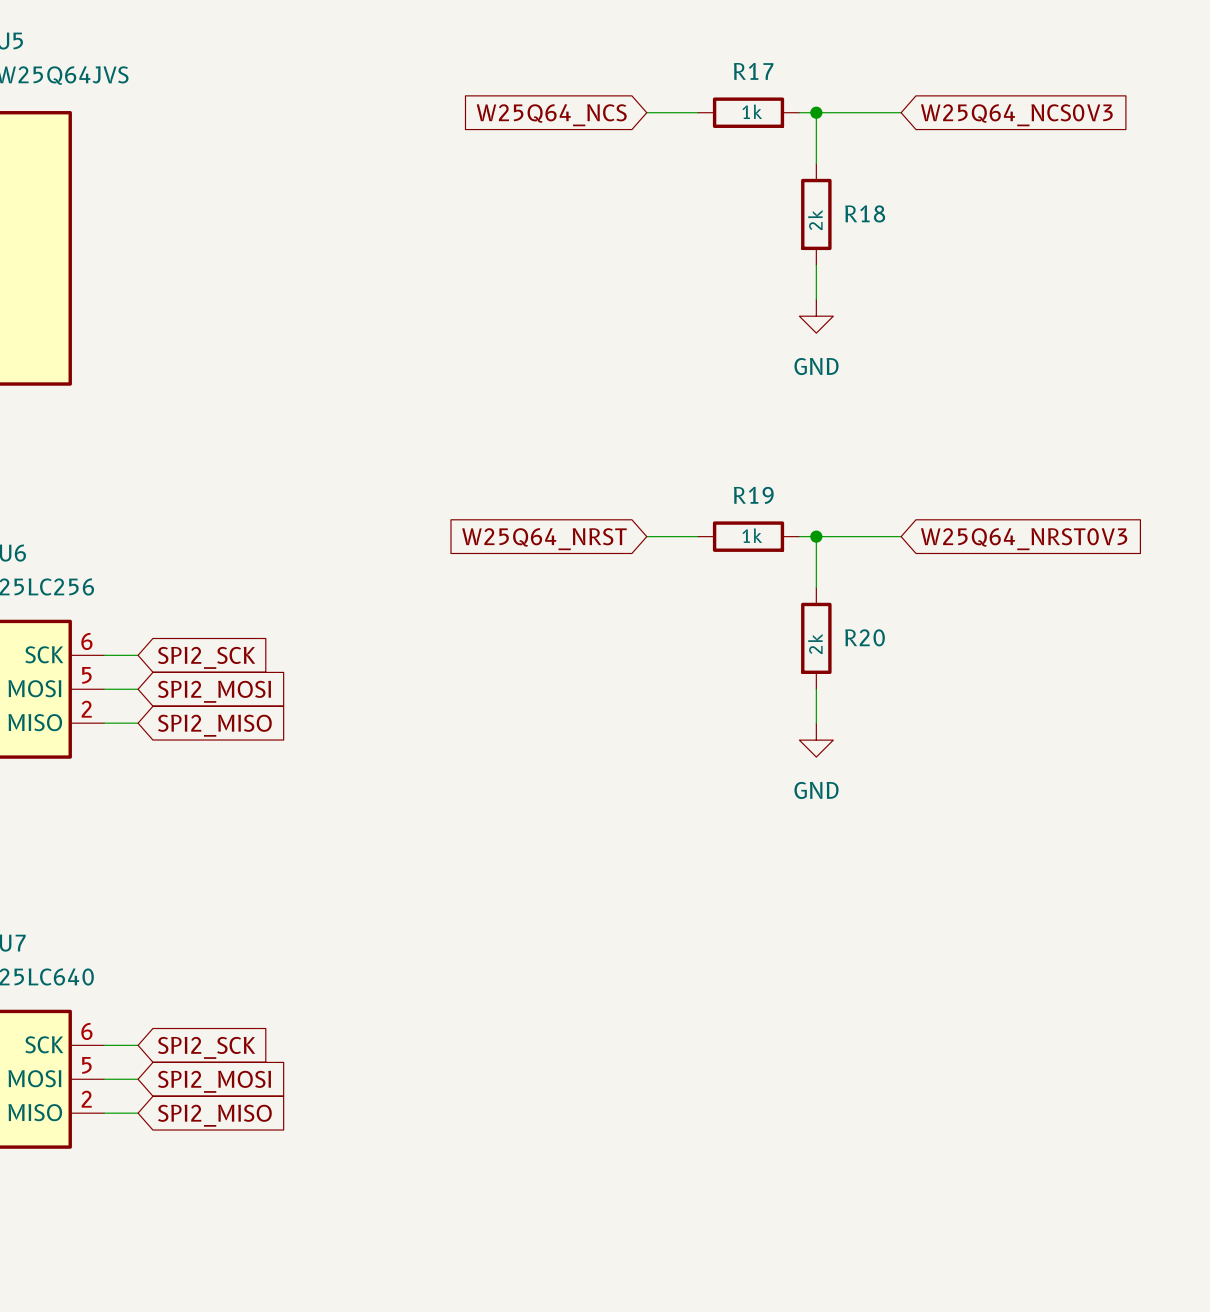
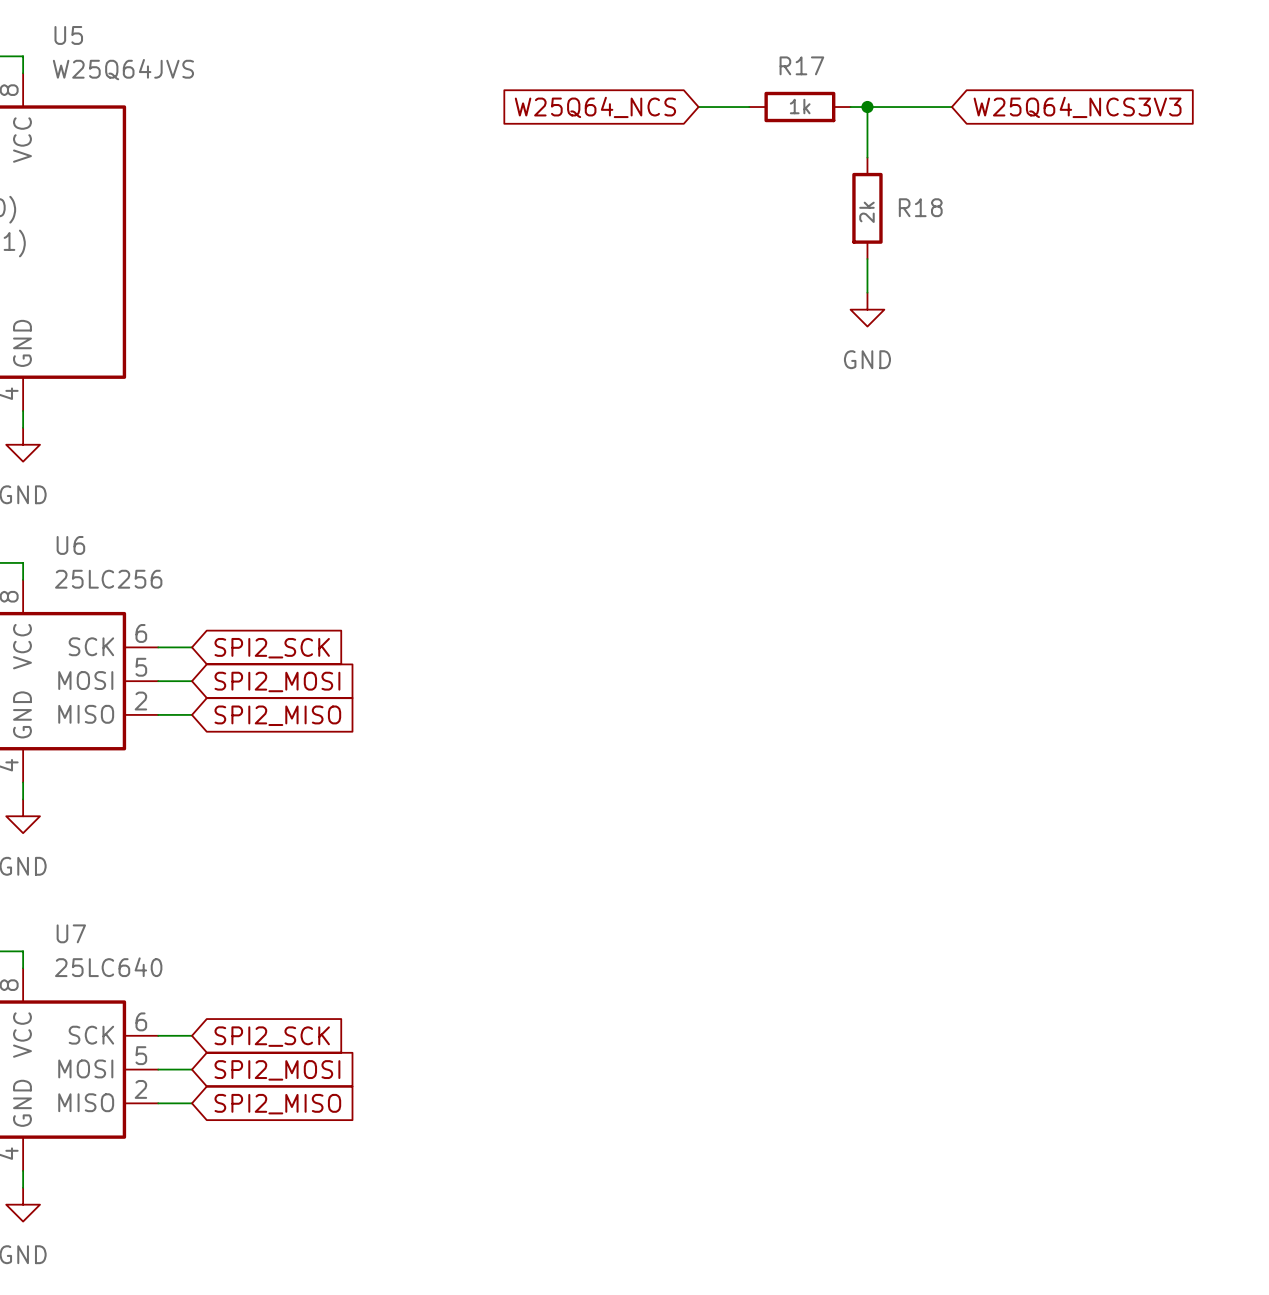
global label: W25Q64_NCS0V3 (1016, 115) -> W25Q64_NCS3V3 (1077, 107)
wire: (646, 536) (697, 536) -> none
R19: 1k (748, 536) -> none
wire: (799, 536) (901, 536) -> none
wire: (816, 536) (816, 587) -> none
junction: (816, 536) -> none
global label: W25Q64_NRST (544, 539) -> none
global label: W25Q64_NRST0V3 (1024, 539) -> none
R20: 2k (816, 638) -> none
wire: (816, 689) (816, 723) -> none
power symbol: GND (816, 740) -> none

